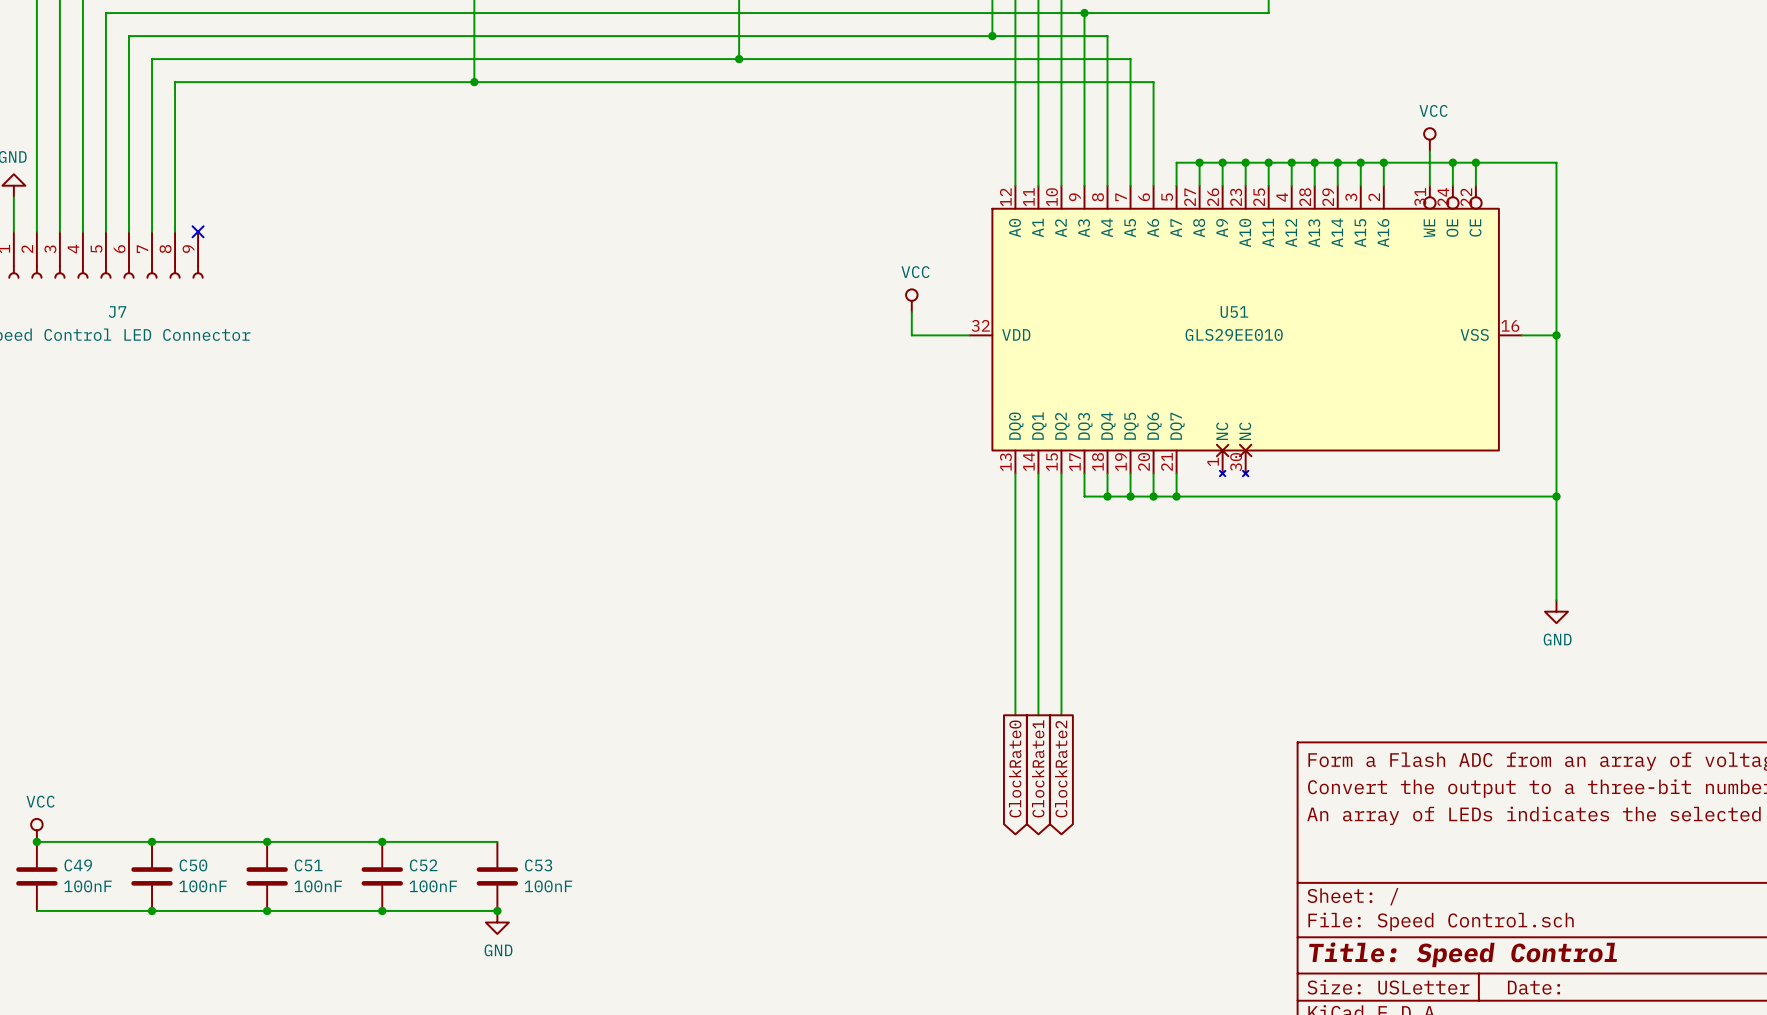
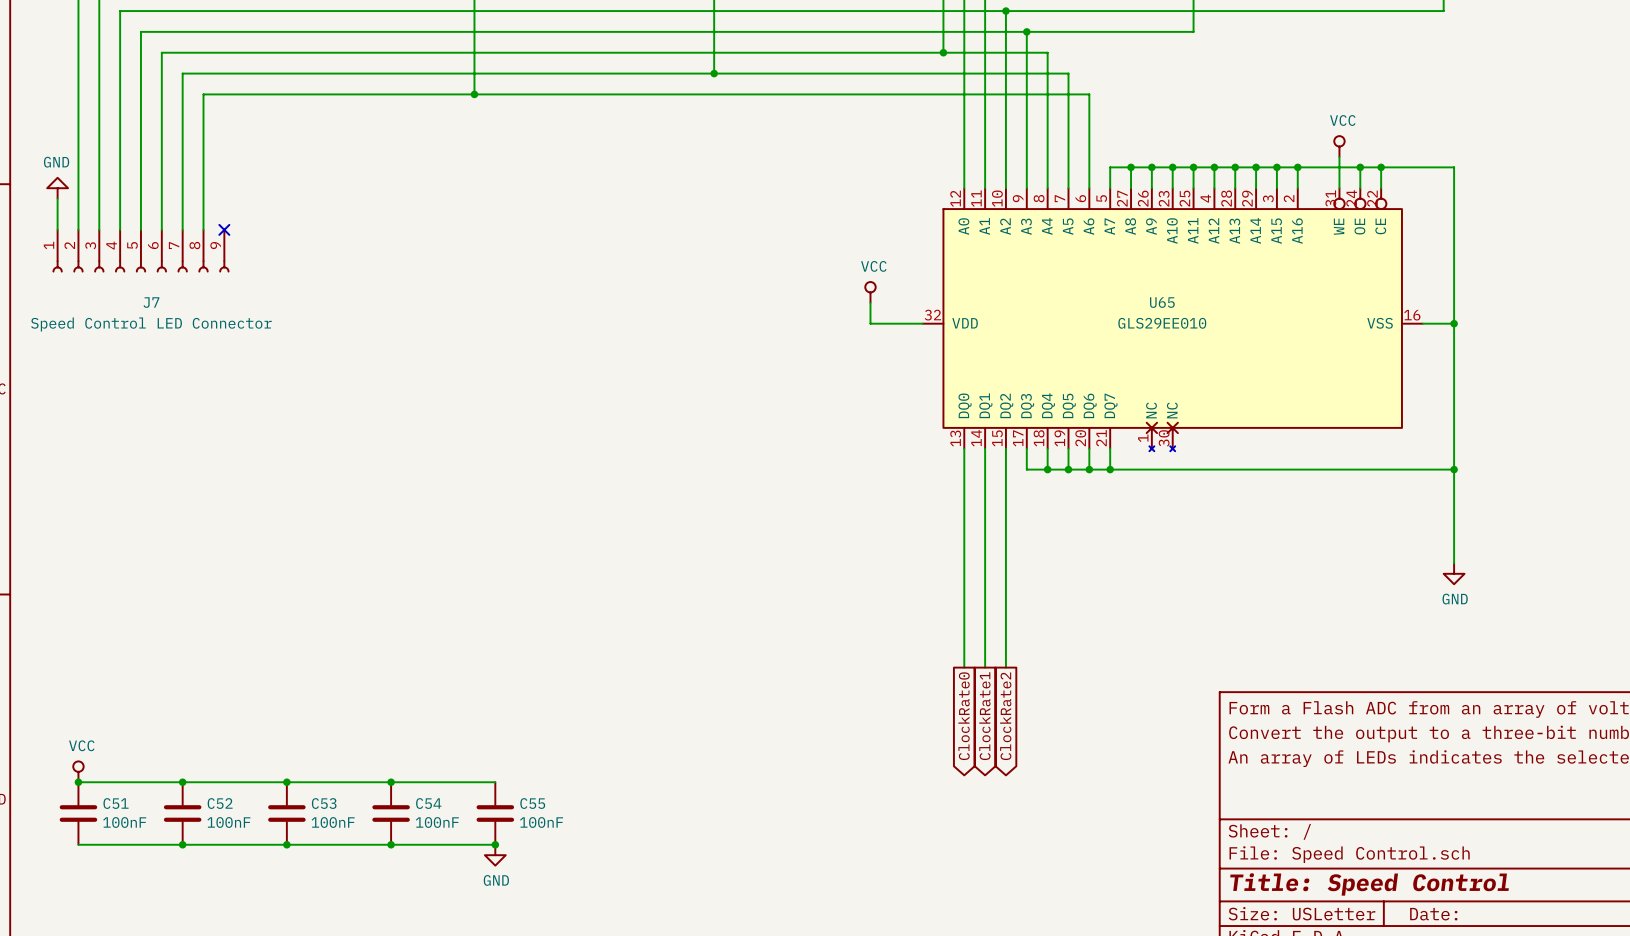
U51 name: U51 (1234, 312) -> U65 (1162, 302)
C49 name: C49 (78, 865) -> C51 (116, 803)
C50 name: C50 (193, 865) -> C52 (220, 803)
C51 name: C51 (308, 865) -> C53 (324, 803)
C52 name: C52 (423, 865) -> C54 (428, 803)
C53 name: C53 (538, 865) -> C55 (532, 803)

